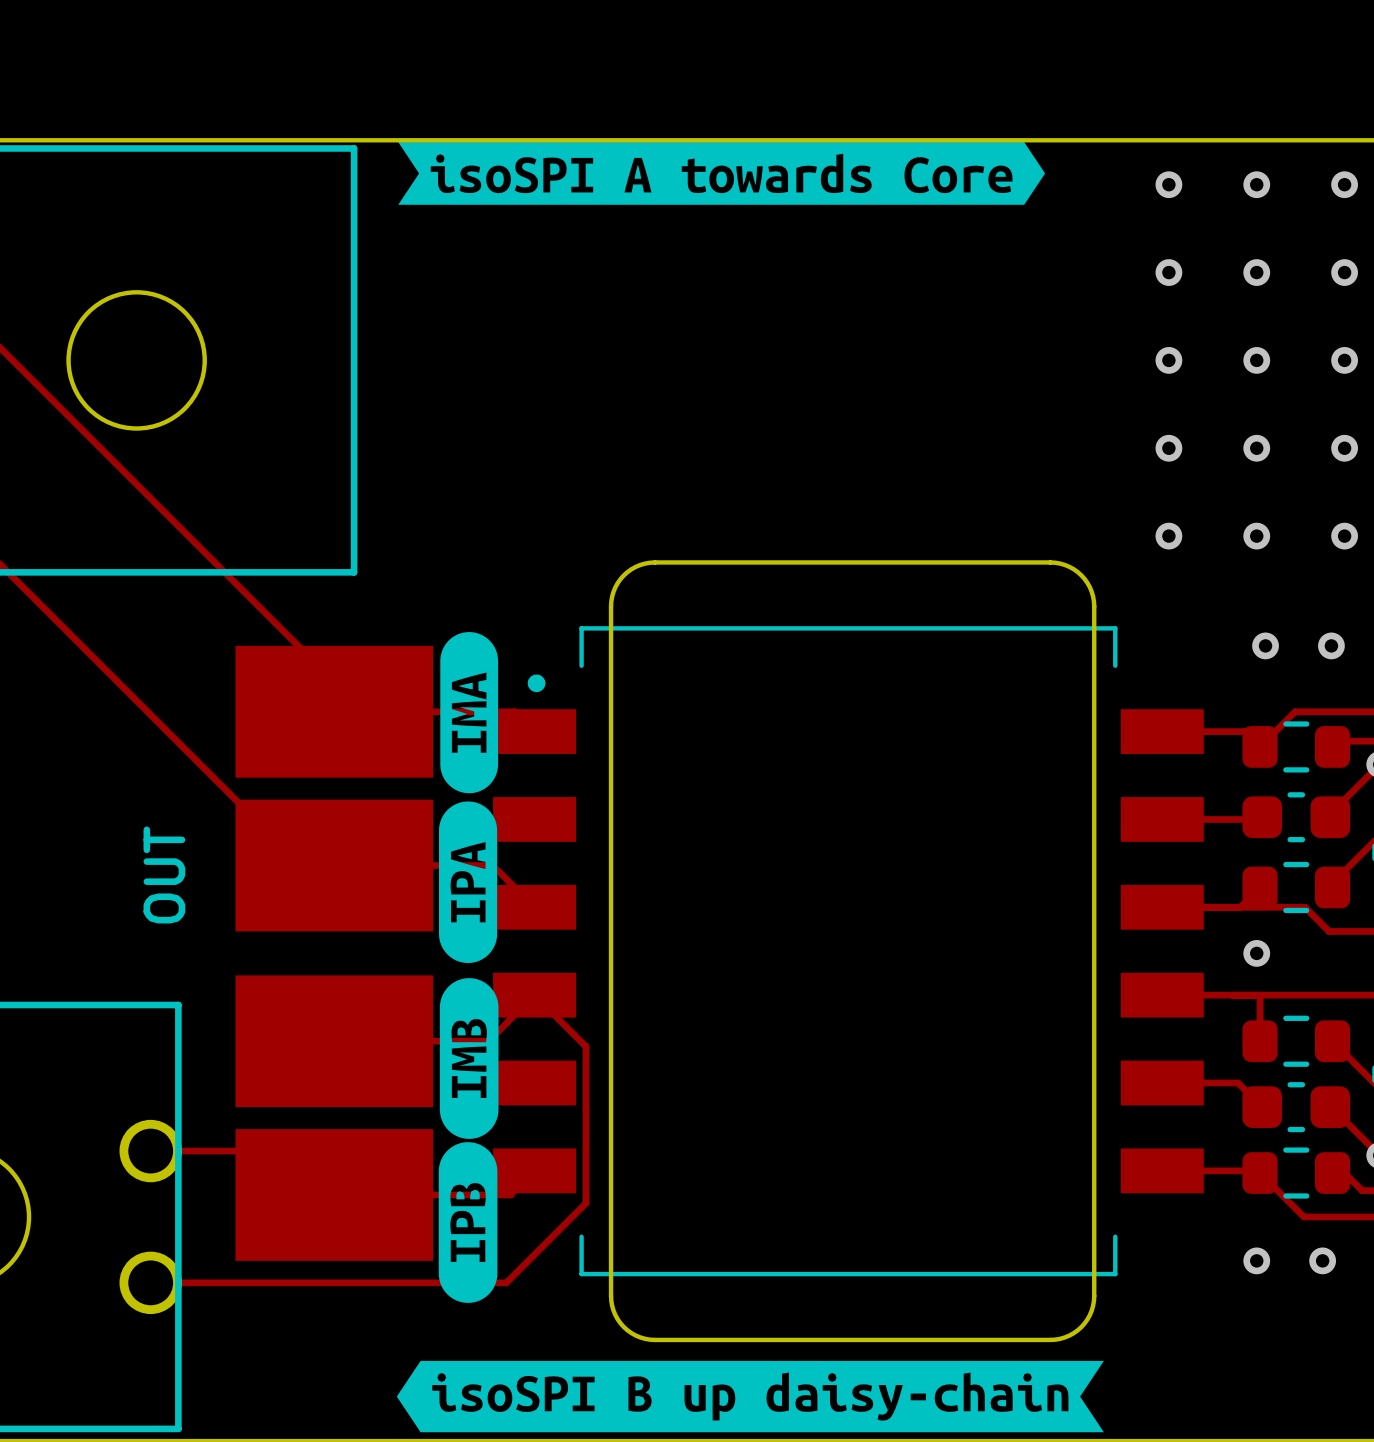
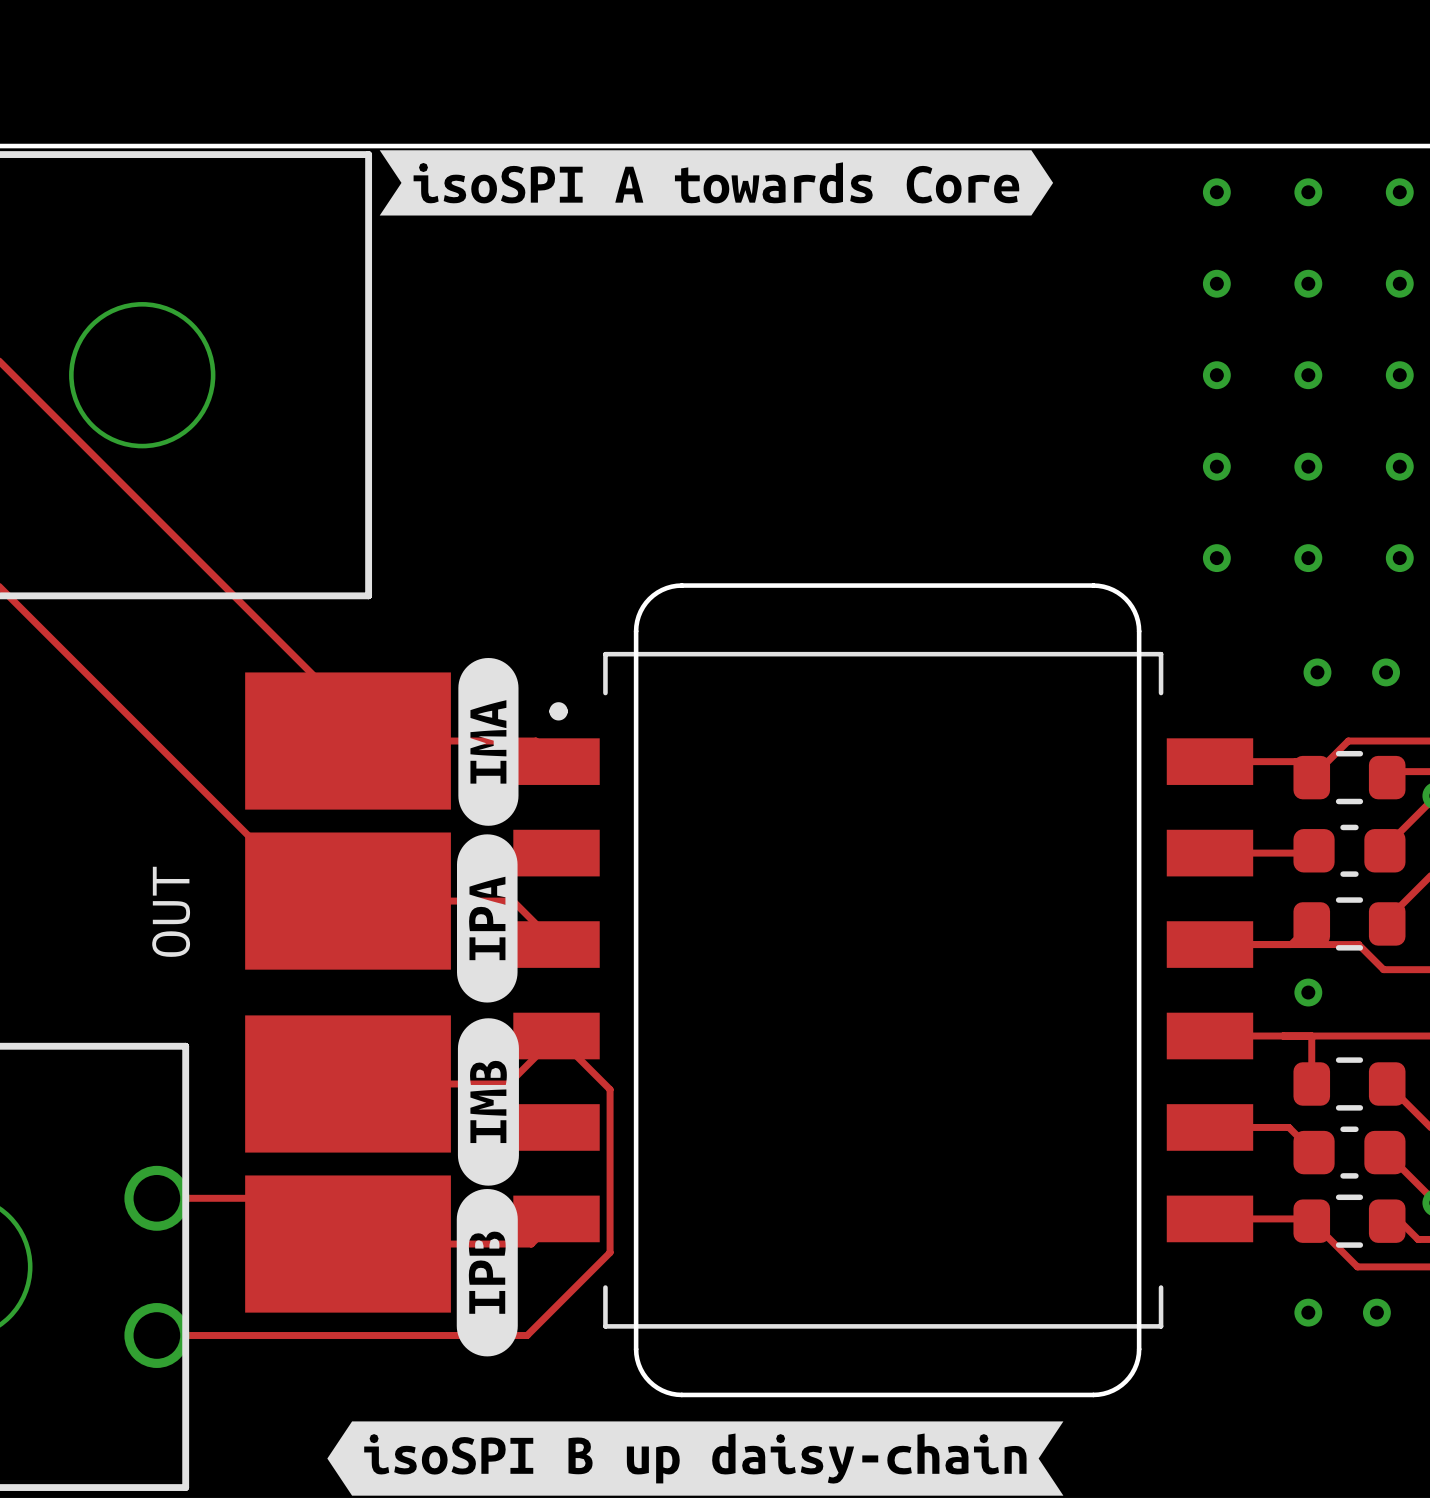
drawing position: (721, 173) -> (716, 182)
drawing position: (750, 1396) -> (695, 1458)

